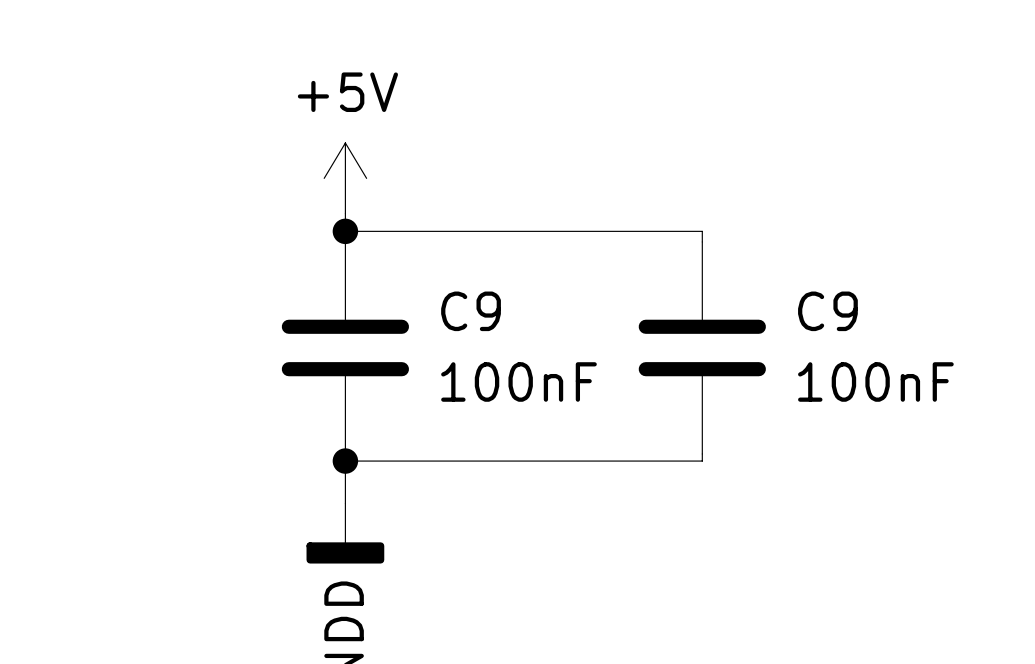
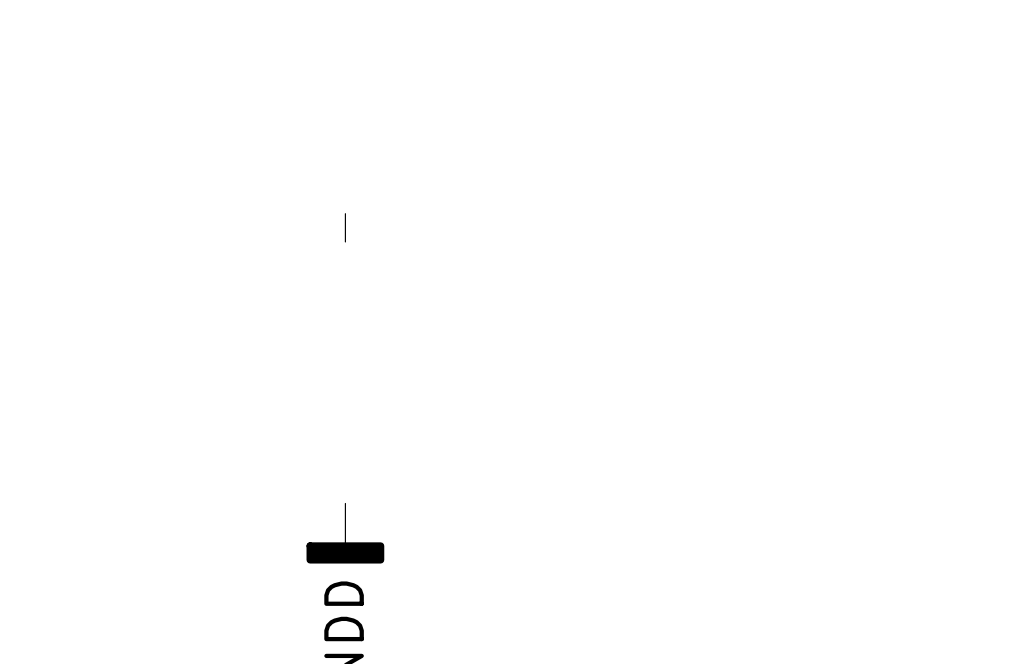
power symbol: +5V (345, 178) -> none
wire: (345, 231) (702, 231) (702, 241) -> none
junction: (345, 231) -> none
C9: 100nF (345, 347) -> none
C9: 100nF (702, 347) -> none
wire: (345, 453) (345, 503) -> none
wire: (702, 453) (702, 461) (345, 461) -> none
junction: (345, 461) -> none

